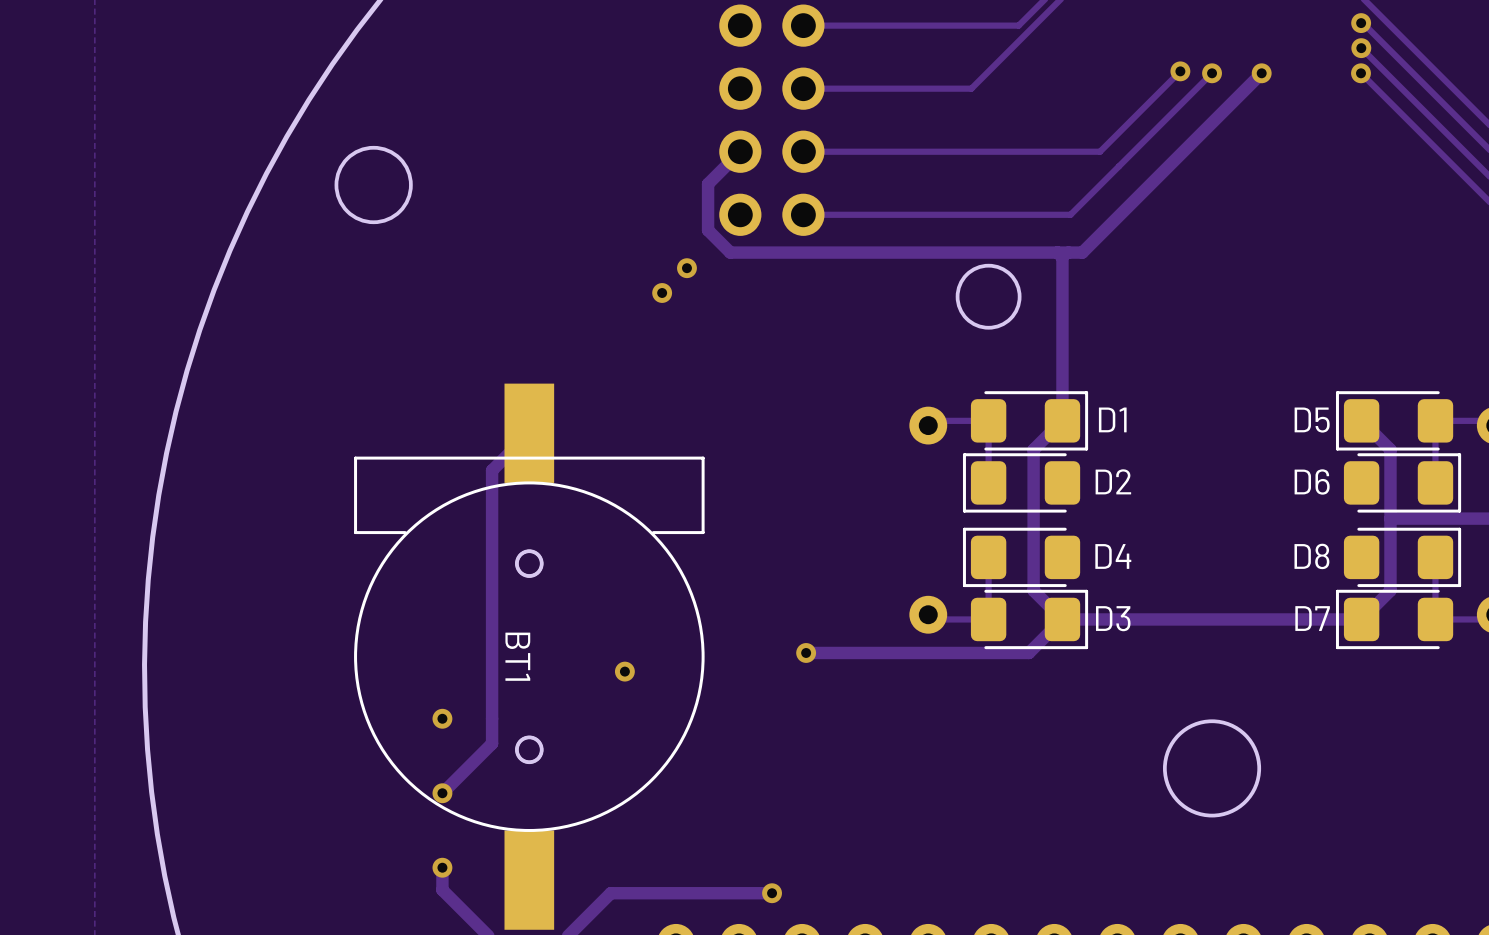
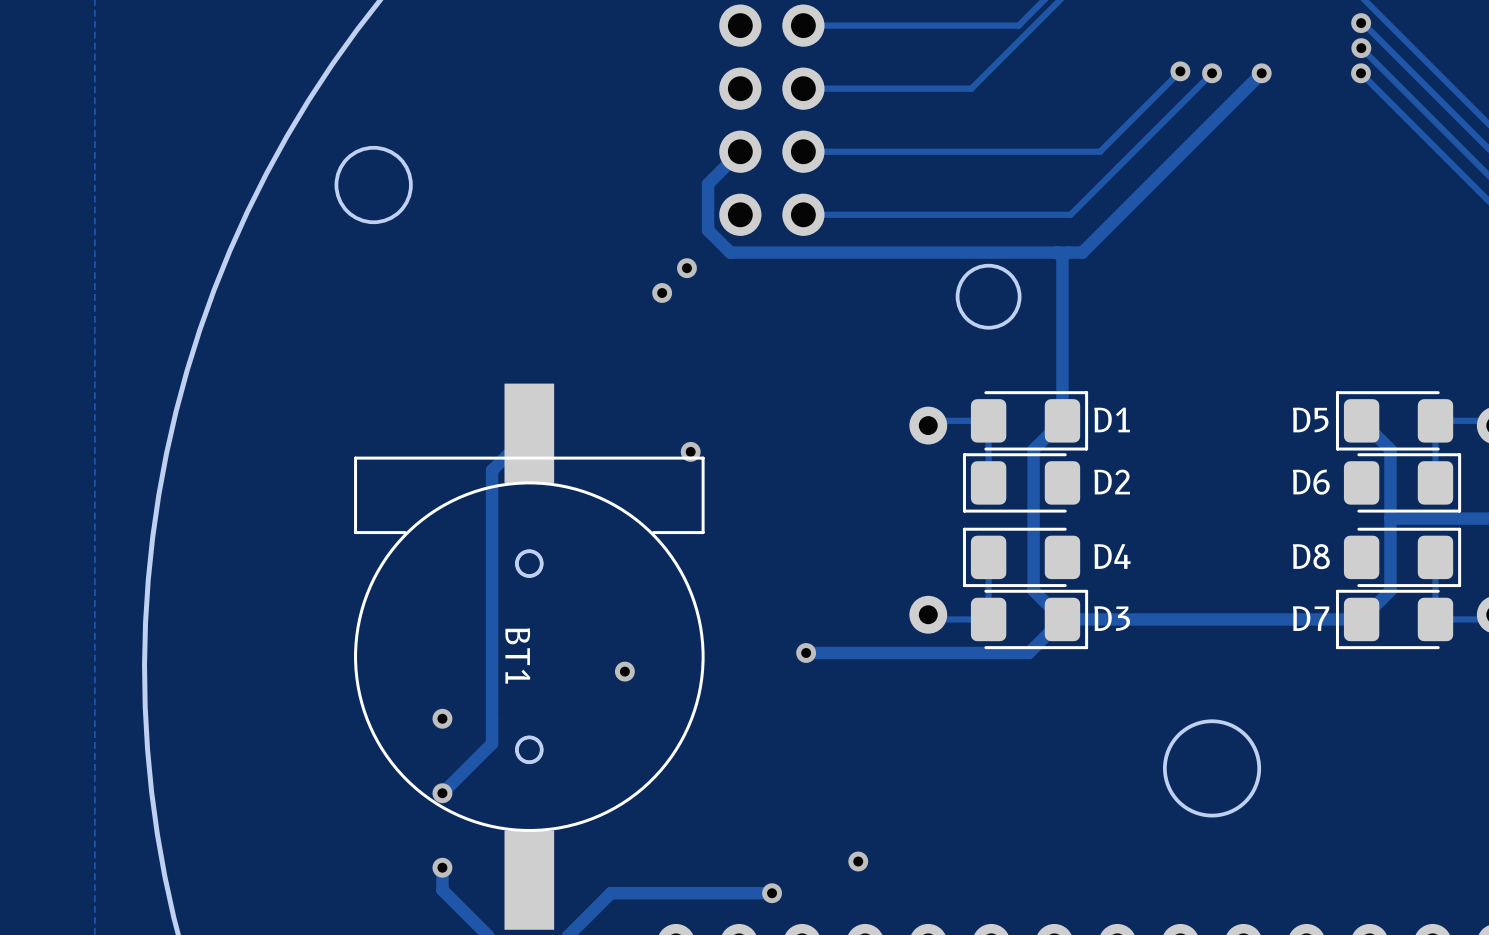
via: none -> (690, 451)
via: none -> (858, 861)

